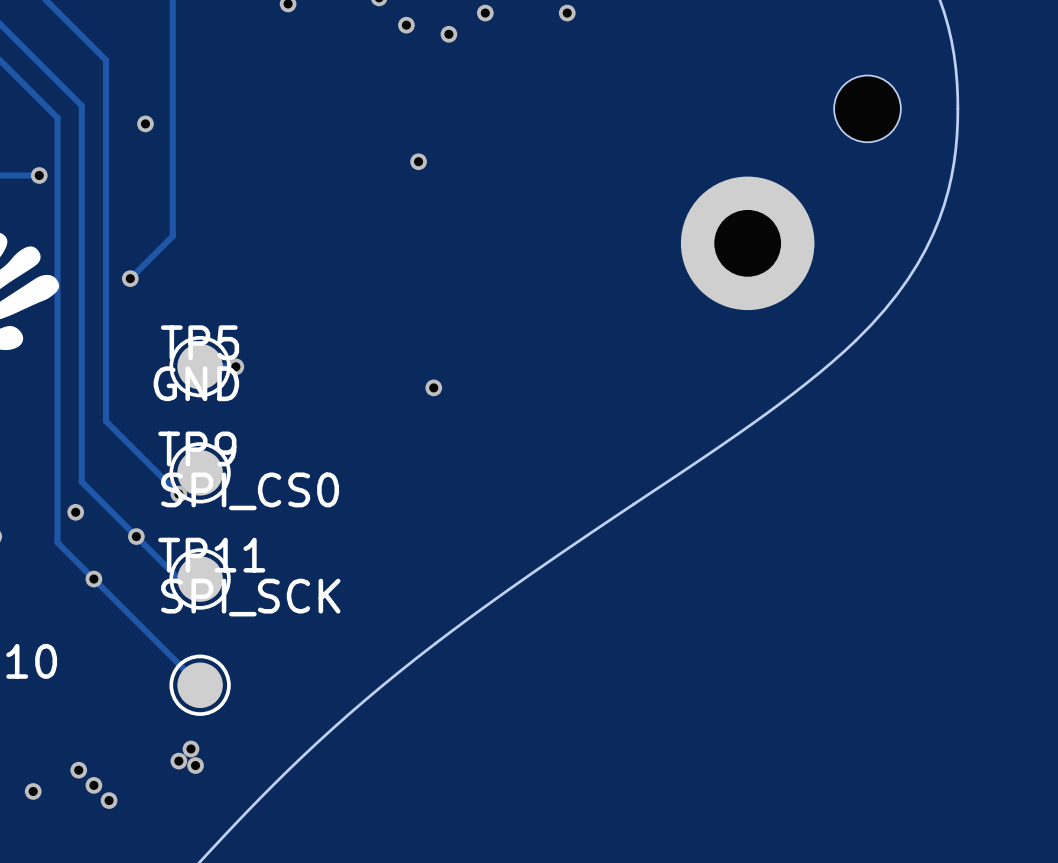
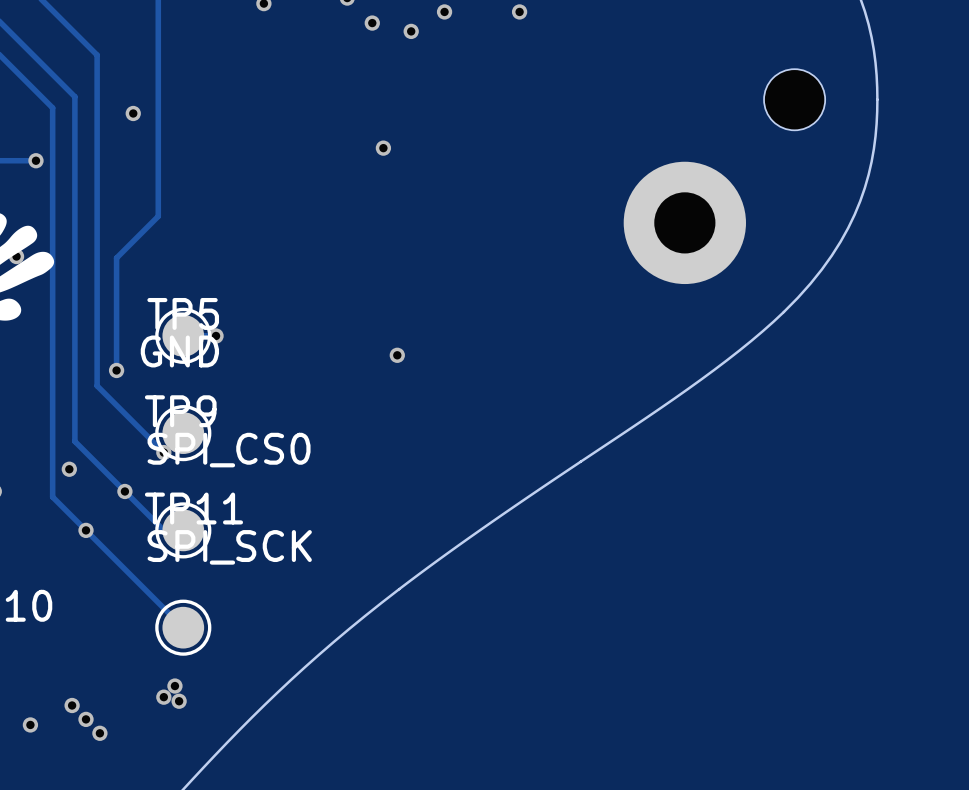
track: none -> (119, 255) (116, 258) (116, 370)
via: (130, 278) -> none
via: none -> (16, 256)
via: none -> (116, 370)

